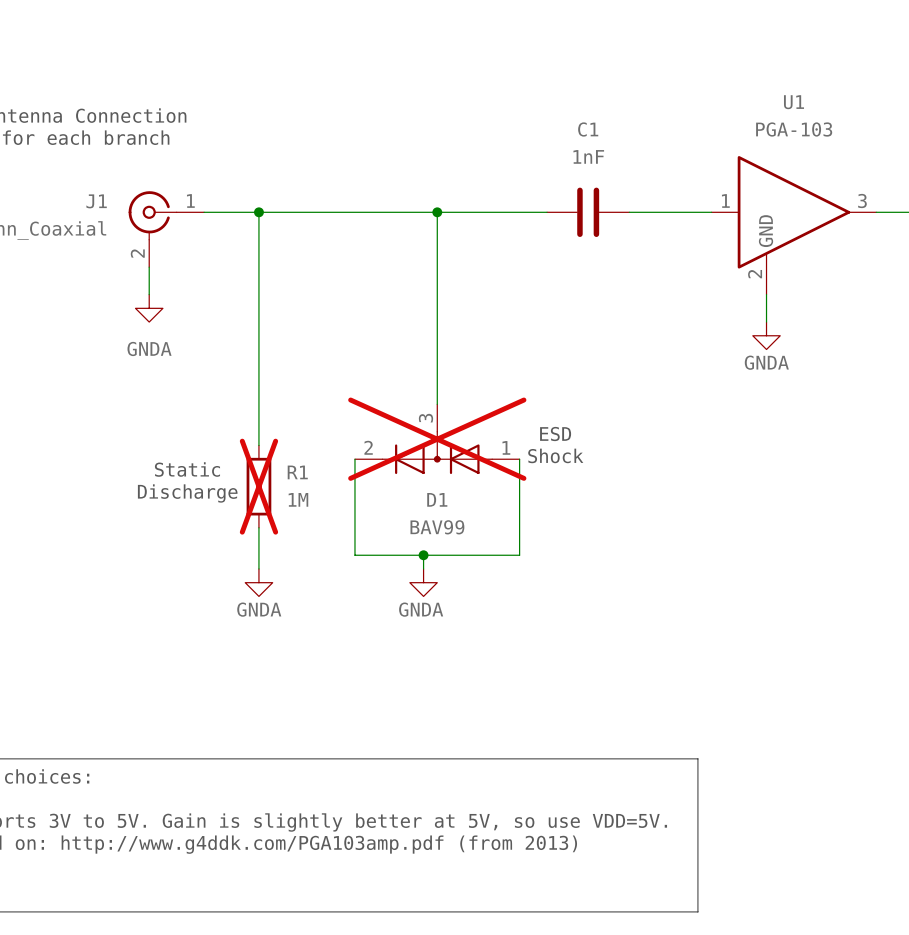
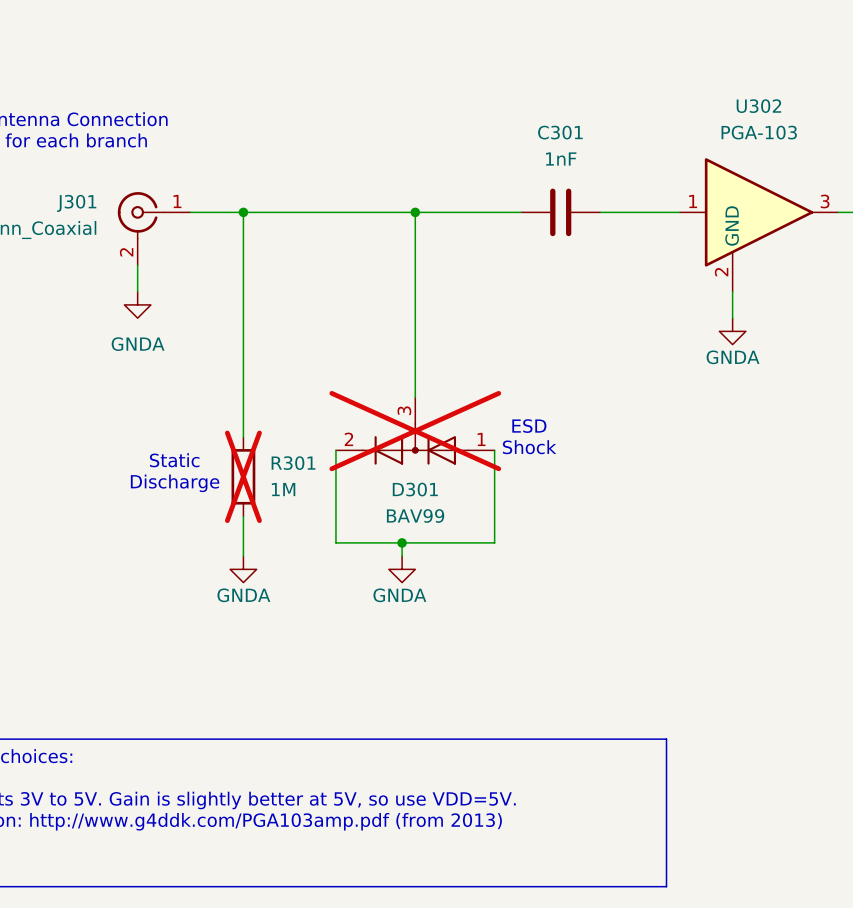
U1 name: U1 (793, 102) -> U302 (758, 106)
C1 name: C1 (588, 129) -> C301 (560, 132)
J1 name: J1 (96, 201) -> J301 (76, 203)
R1 name: R1 (297, 472) -> R301 (293, 463)
D1 name: D1 (437, 499) -> D301 (415, 489)

